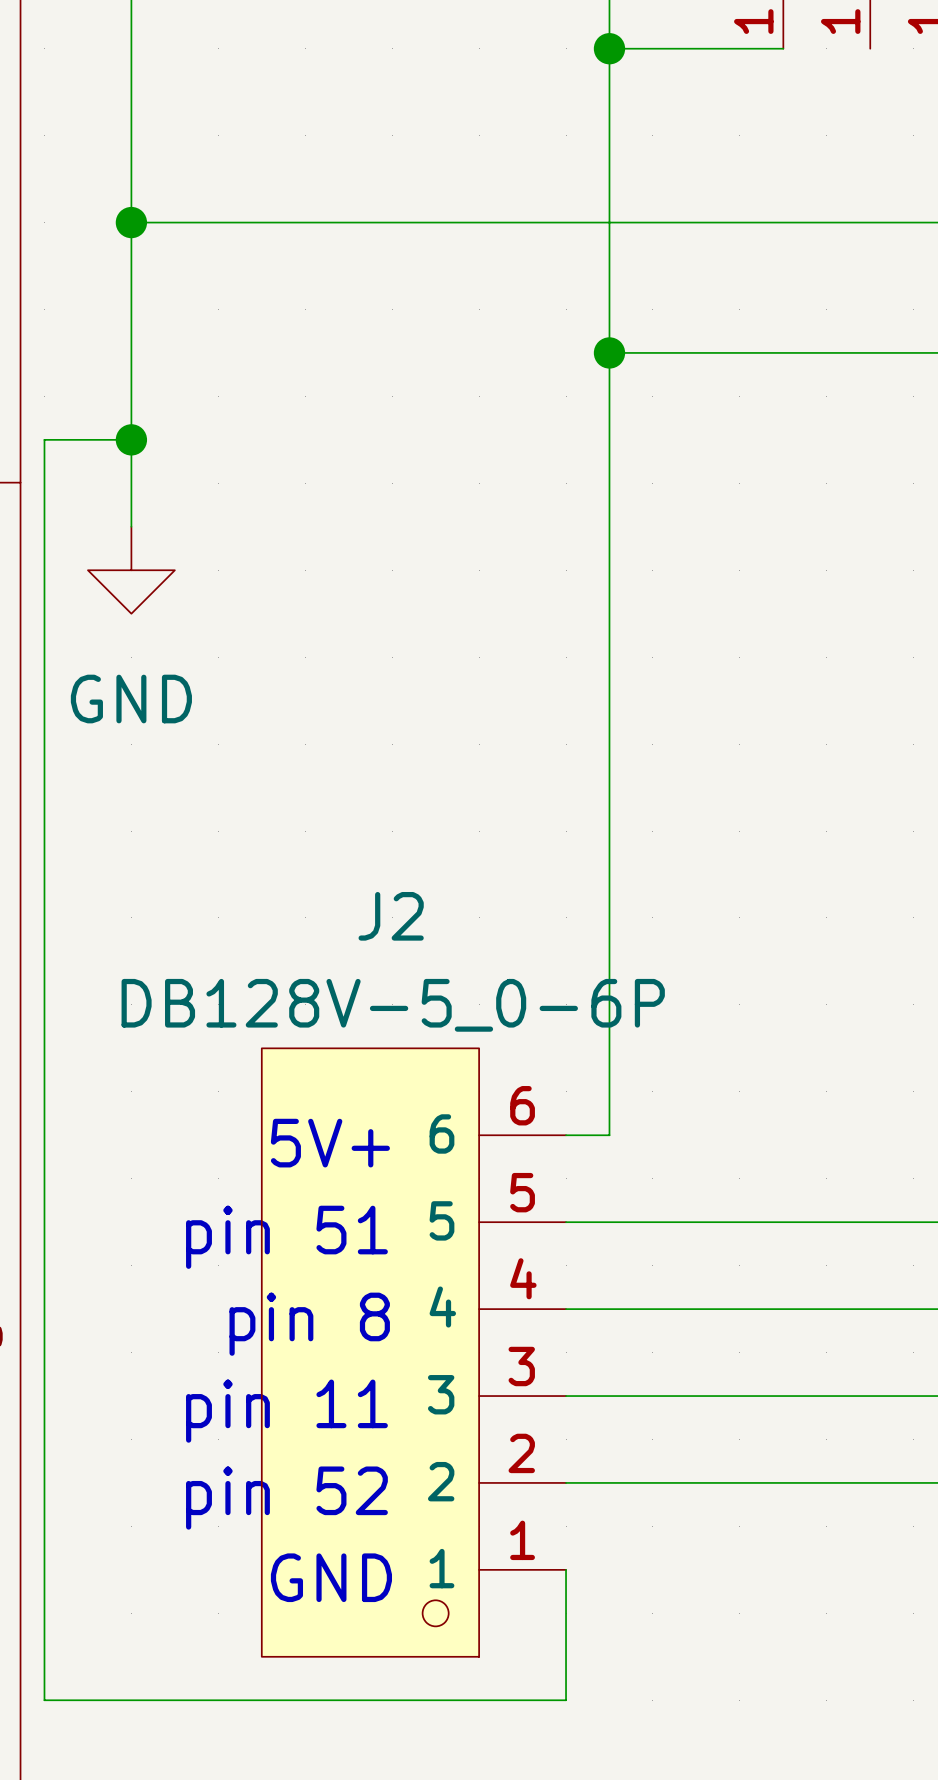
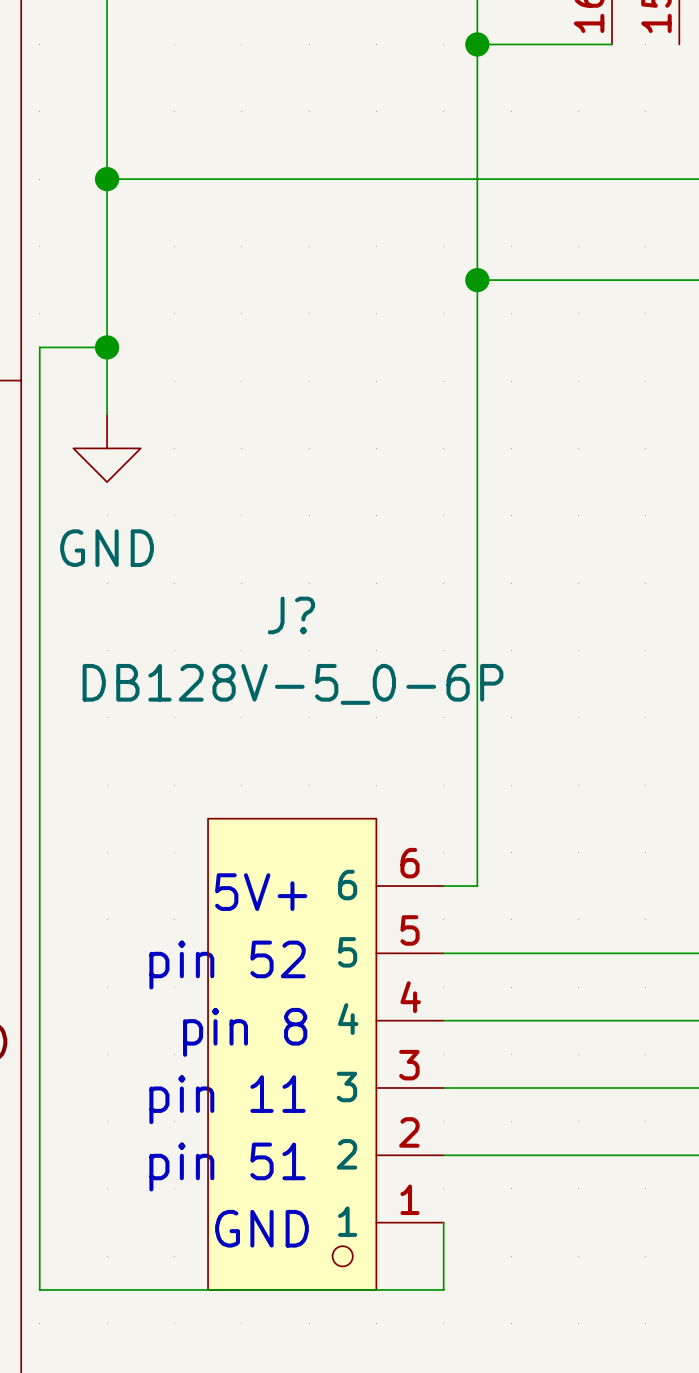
J2 name: J2 (391, 916) -> J? (291, 615)
J2 value position: DB128V-5_0-6P (393, 1005) -> DB128V-5_0-6P (293, 684)
text: pin 51 (286, 1237) -> pin 52 (227, 965)
text: pin 52 (286, 1498) -> pin 51 (227, 1167)
wire: (44, 1656) (44, 1700) (566, 1700) (566, 1656) -> (39, 1289) (443, 1289)

